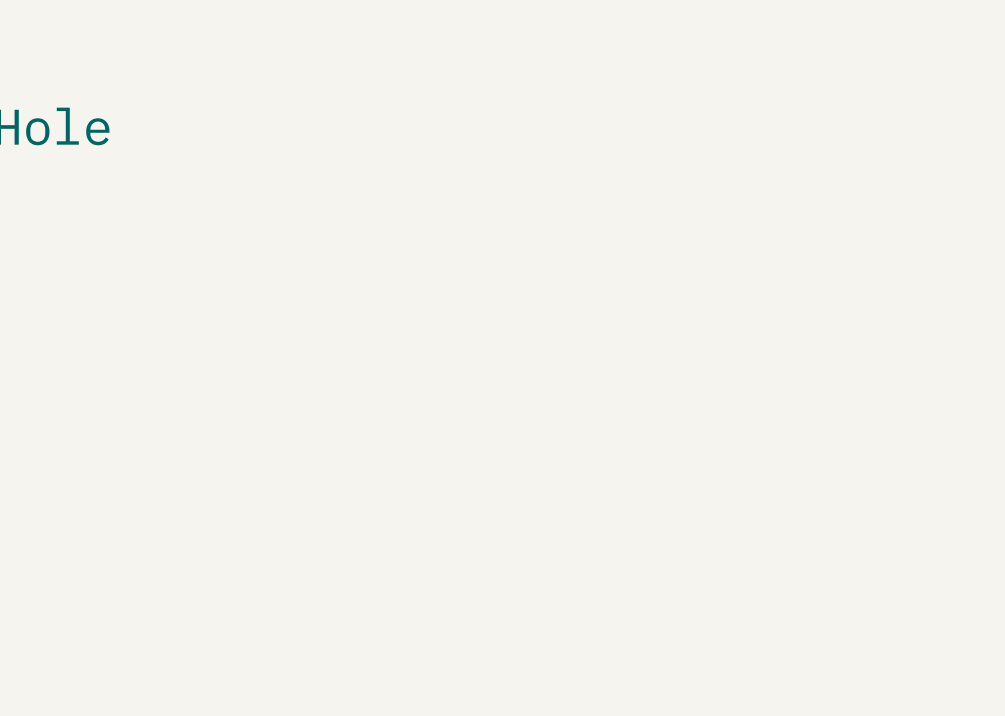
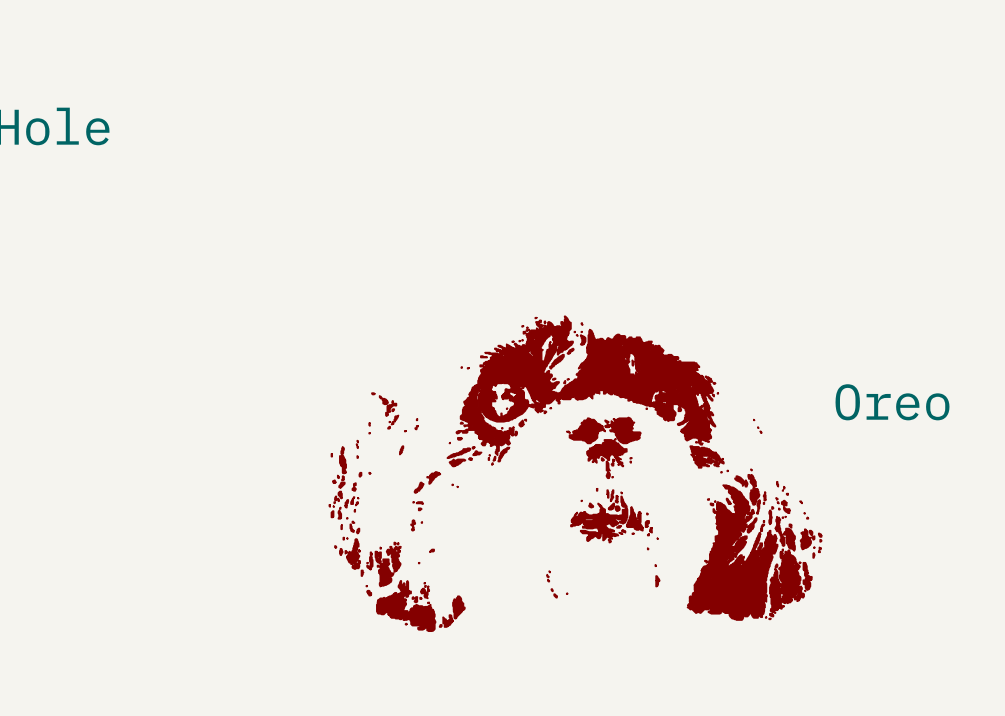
part: none -> Oreo (575, 473)

